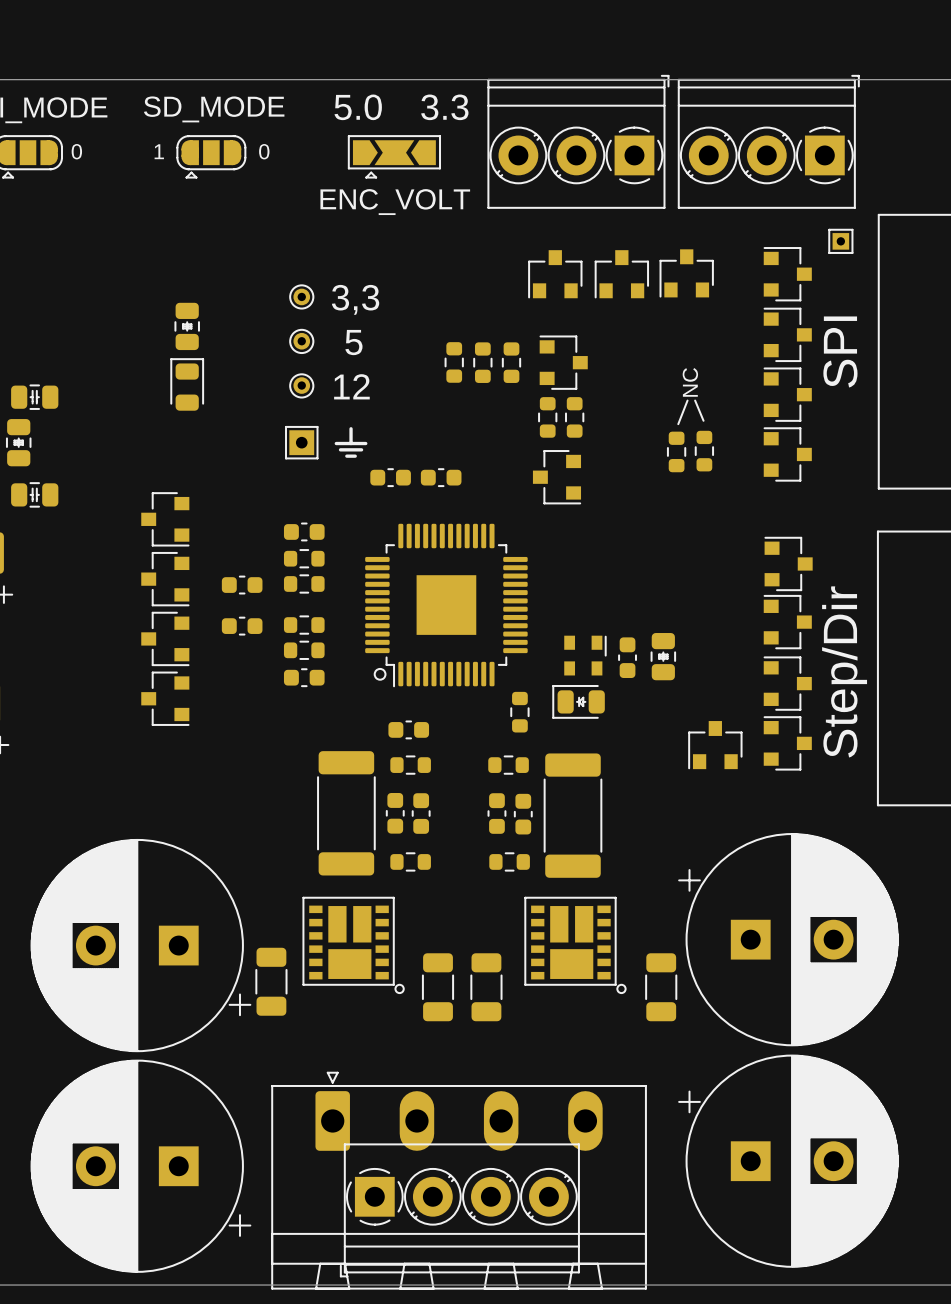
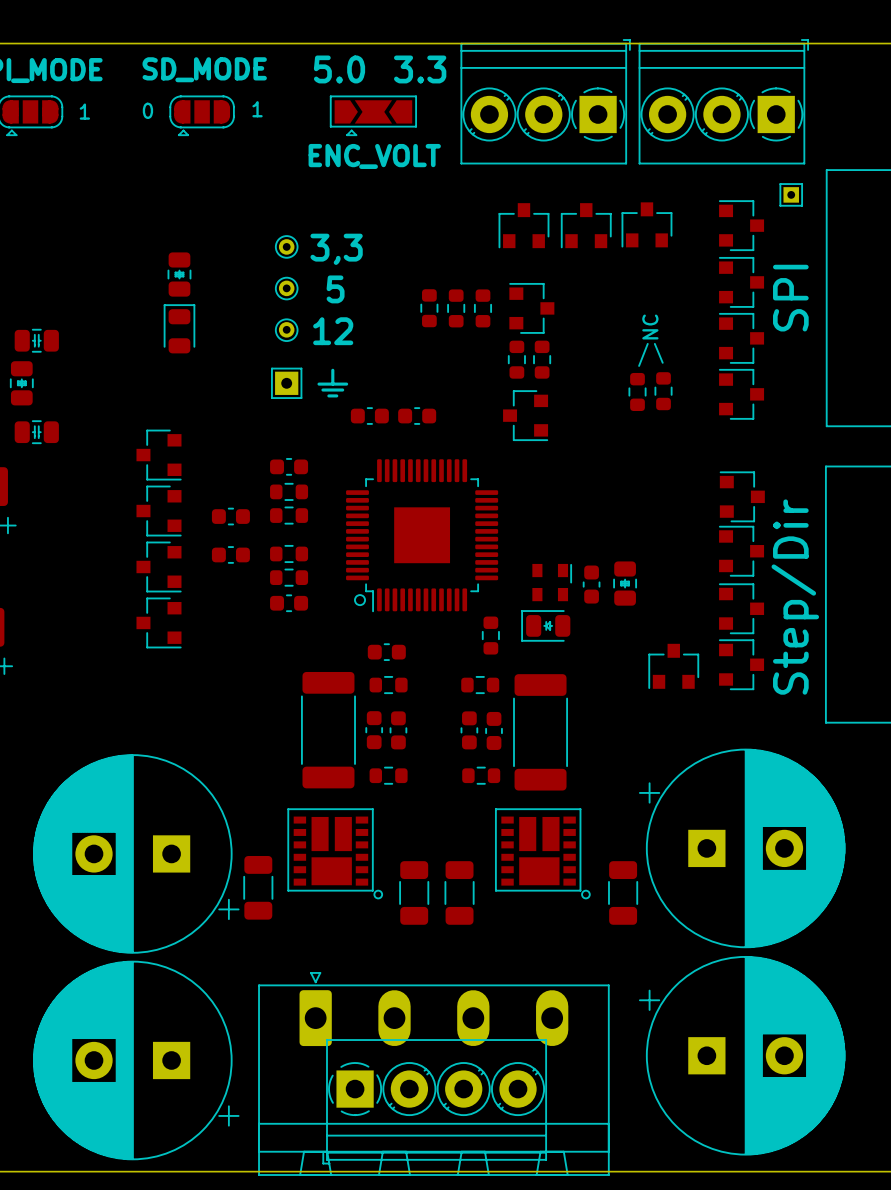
text: 0 (76, 151) -> 1 (84, 111)
text: 1 (159, 151) -> 0 (147, 110)
text: 0 (264, 151) -> 1 (257, 109)

